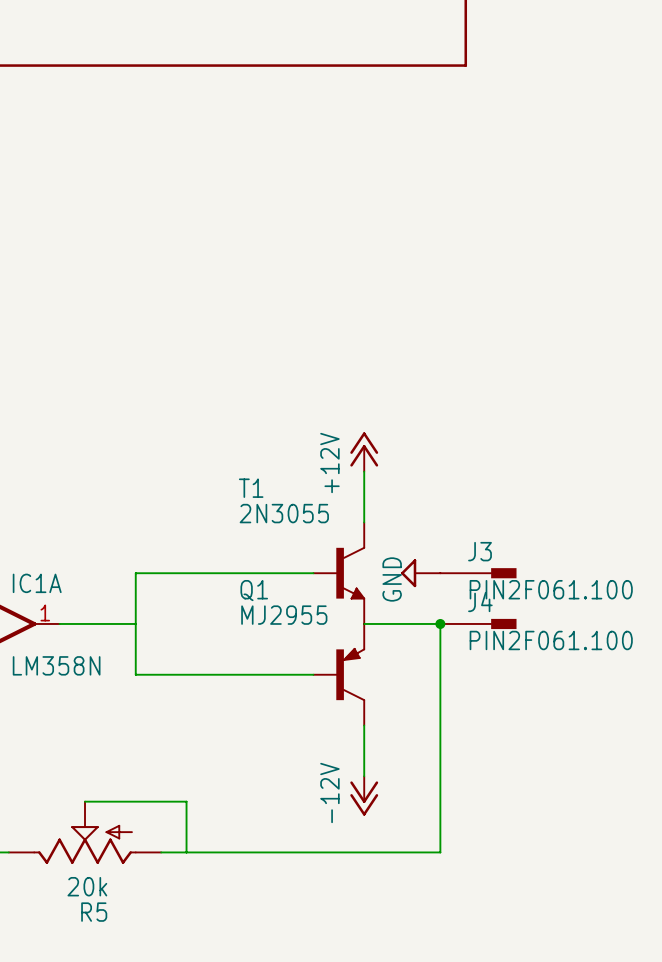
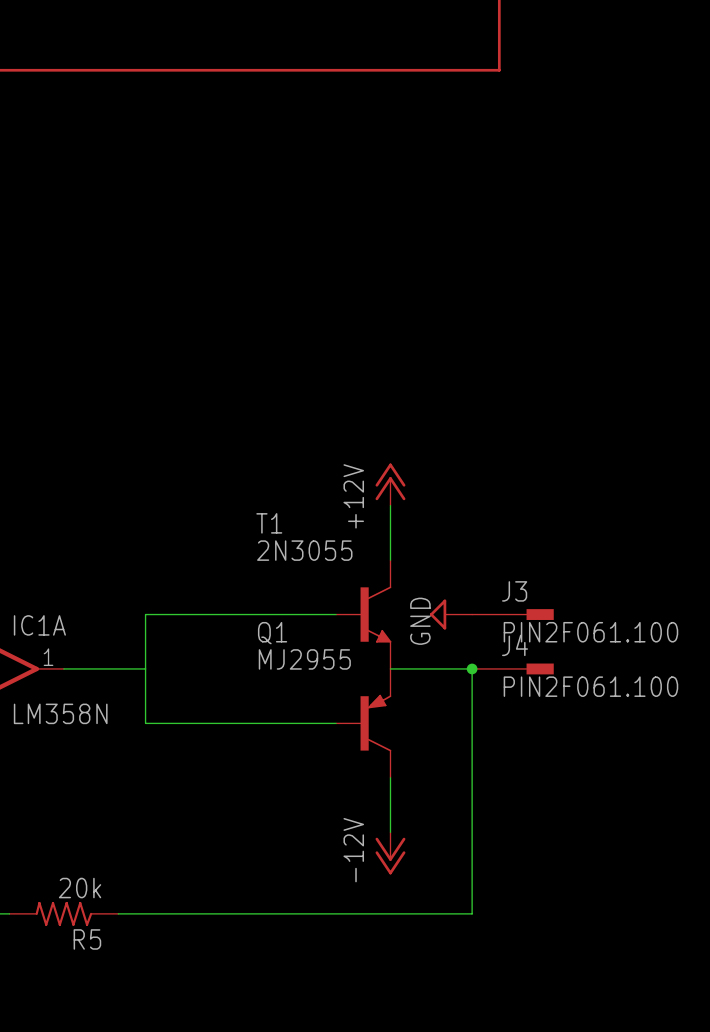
R5 symbol: [8, 801, 162, 864] -> [9, 901, 119, 926]
wire: (85, 801) (186, 801) (186, 852) -> none
R5 value position: 20k (87, 886) -> 20k (80, 888)
R5 name position: R5 (94, 912) -> R5 (87, 939)

